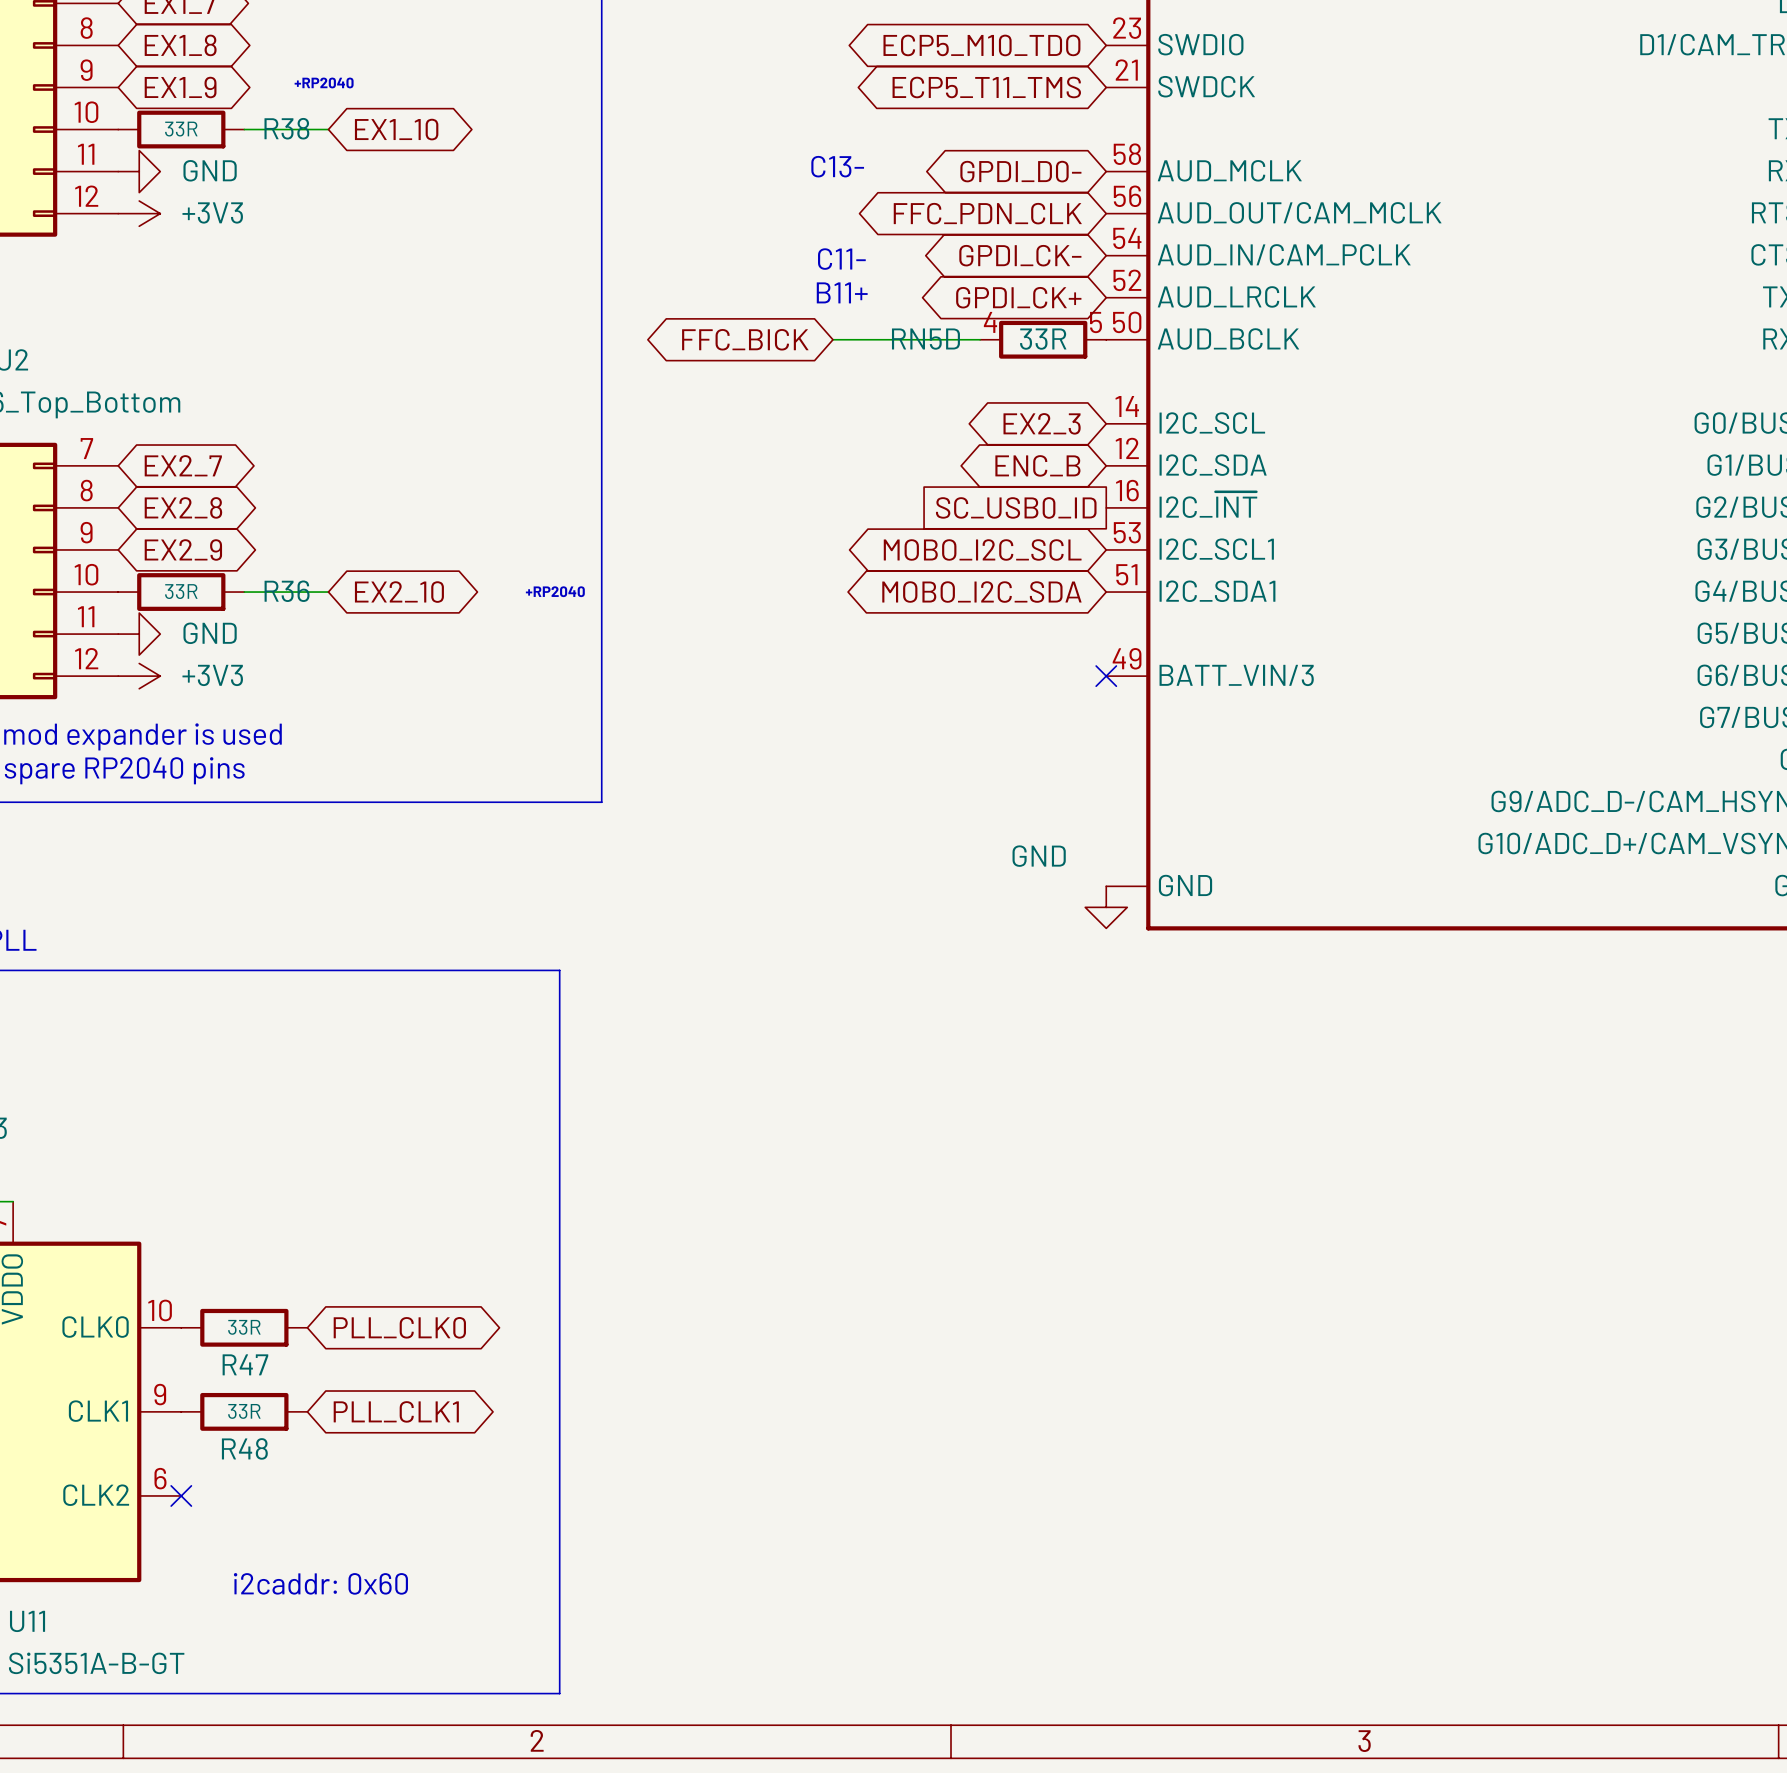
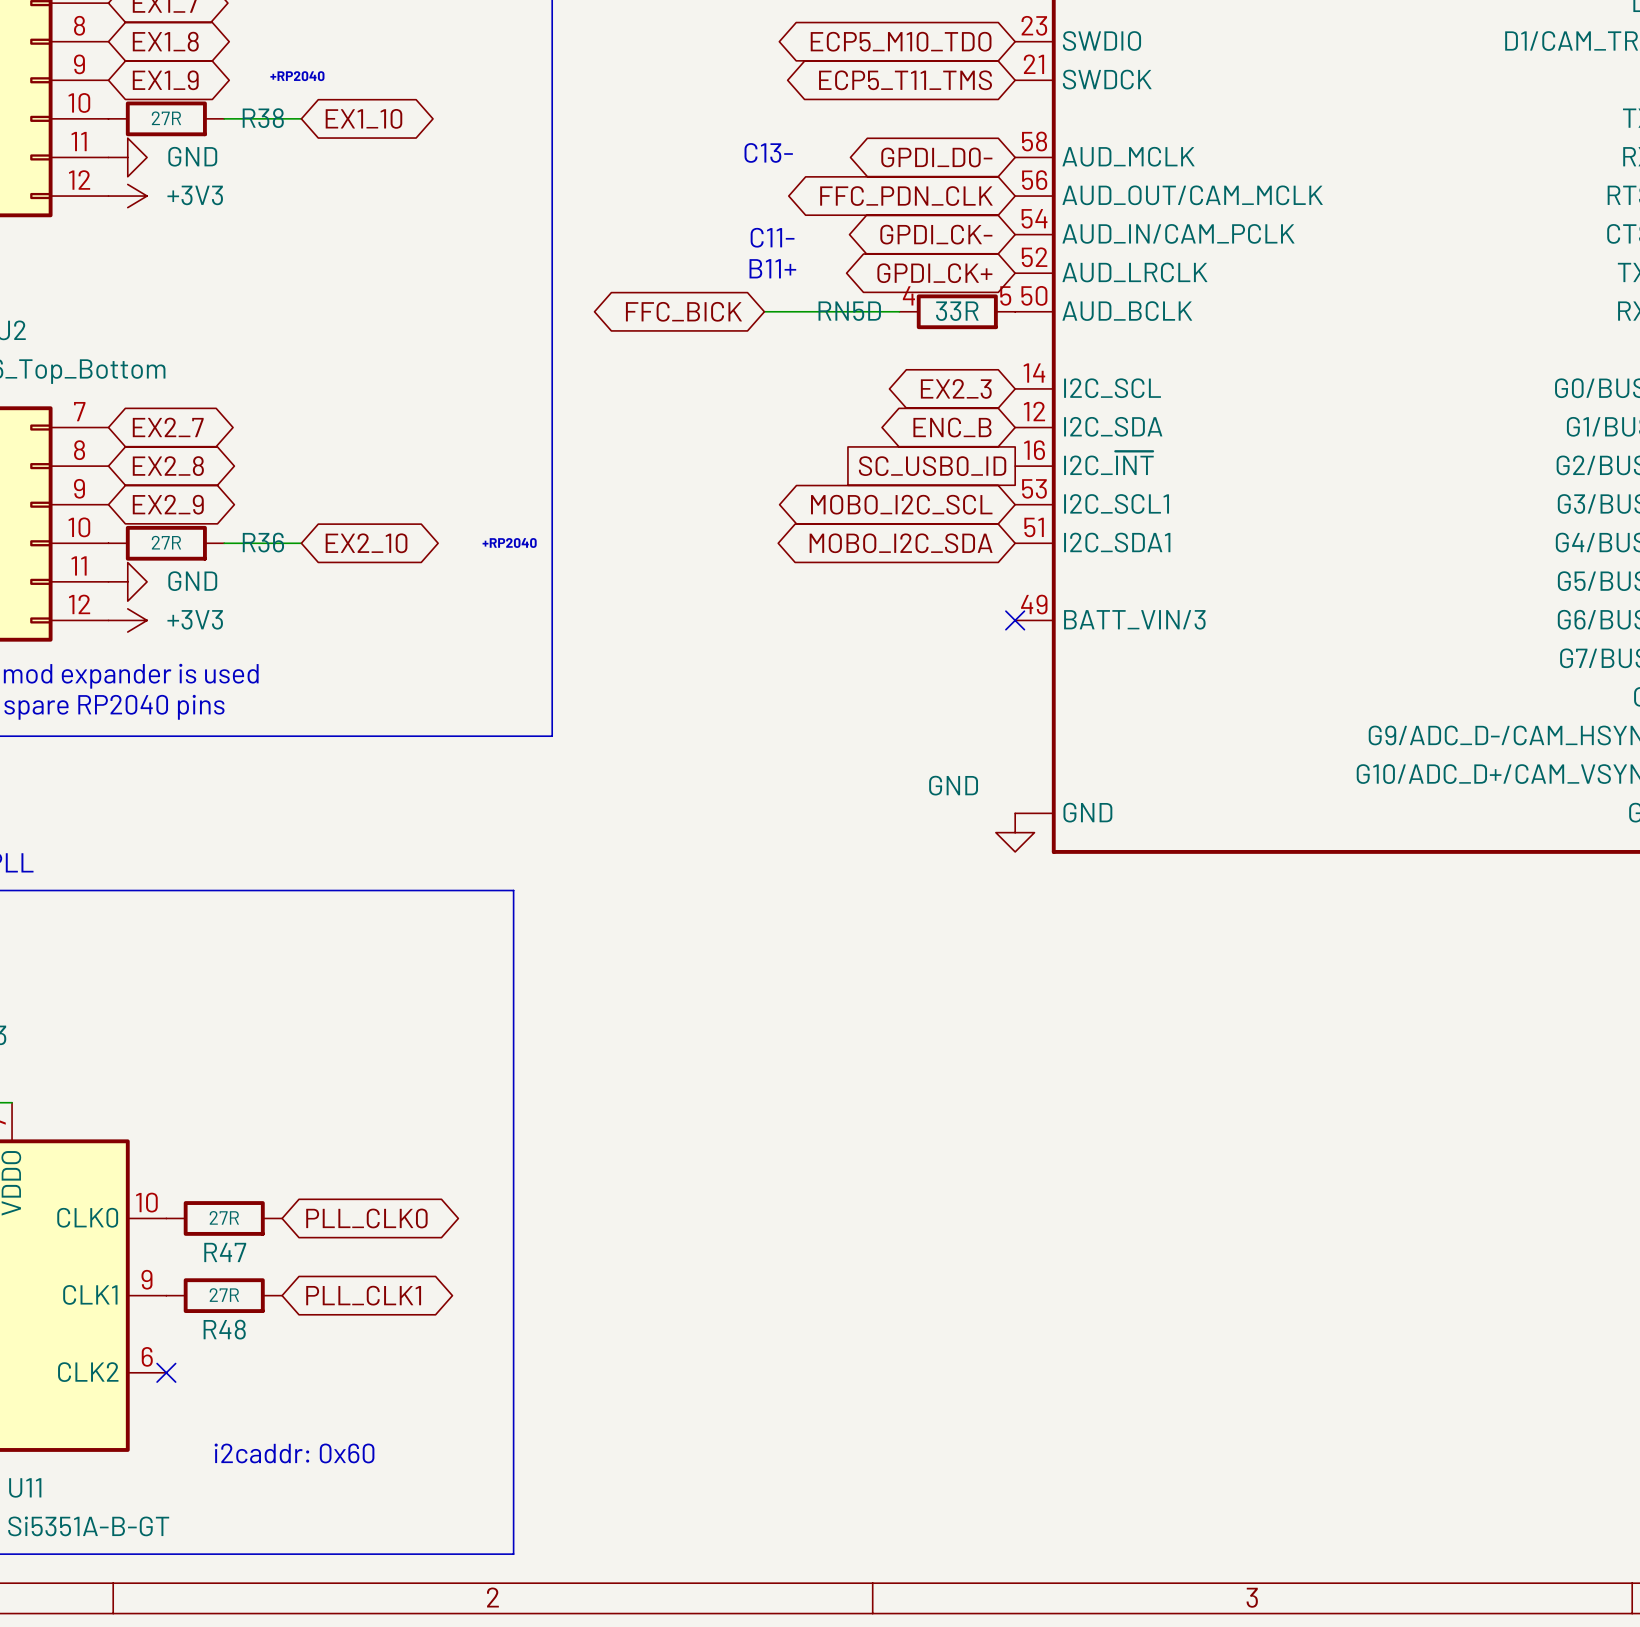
R38 value: 33R (181, 129) -> 27R (166, 118)
R36 value: 33R (181, 591) -> 27R (166, 542)
R47 value: 33R (244, 1327) -> 27R (224, 1217)
R48 value: 33R (244, 1411) -> 27R (224, 1295)

